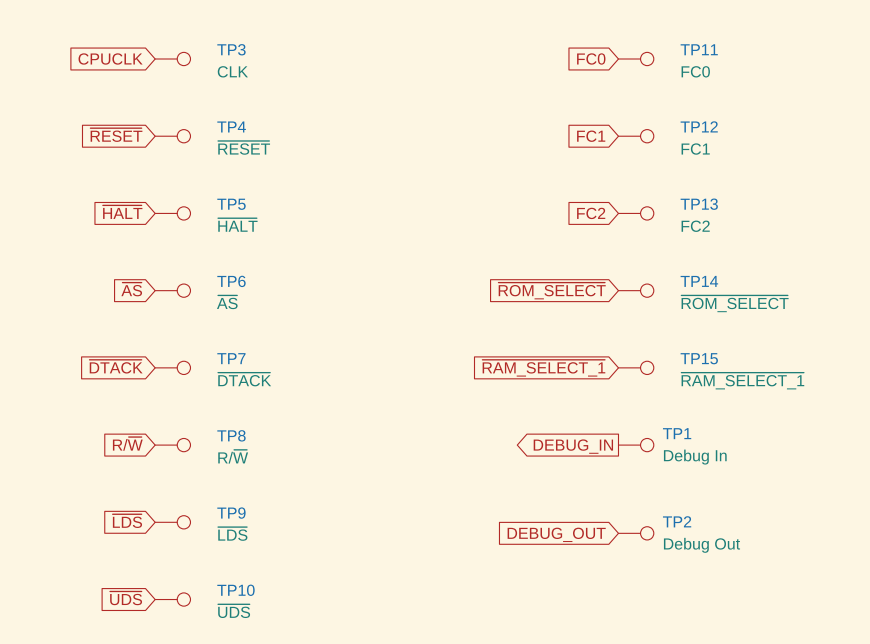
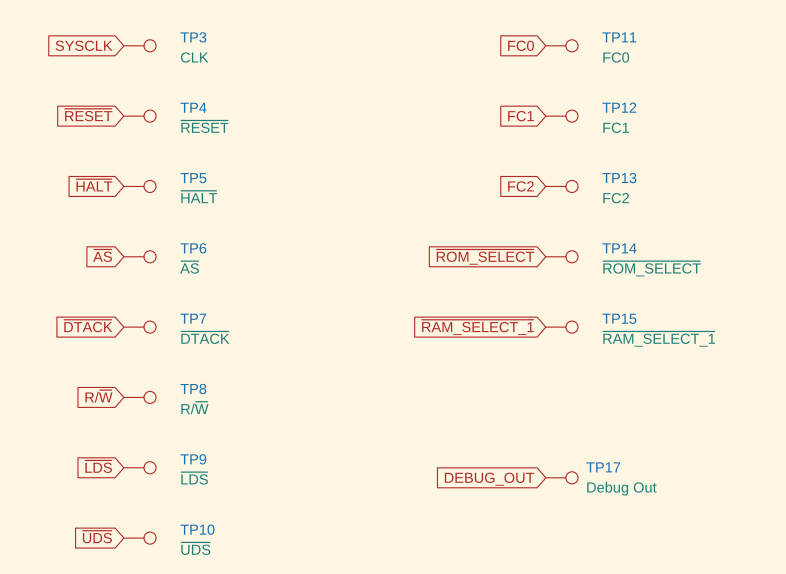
global label: CPUCLK (110, 58) -> SYSCLK (84, 45)
TP1: Debug In (636, 445) -> none
global label: DEBUG_IN (573, 446) -> none
TP2 name: TP2 (677, 521) -> TP17 (603, 467)

